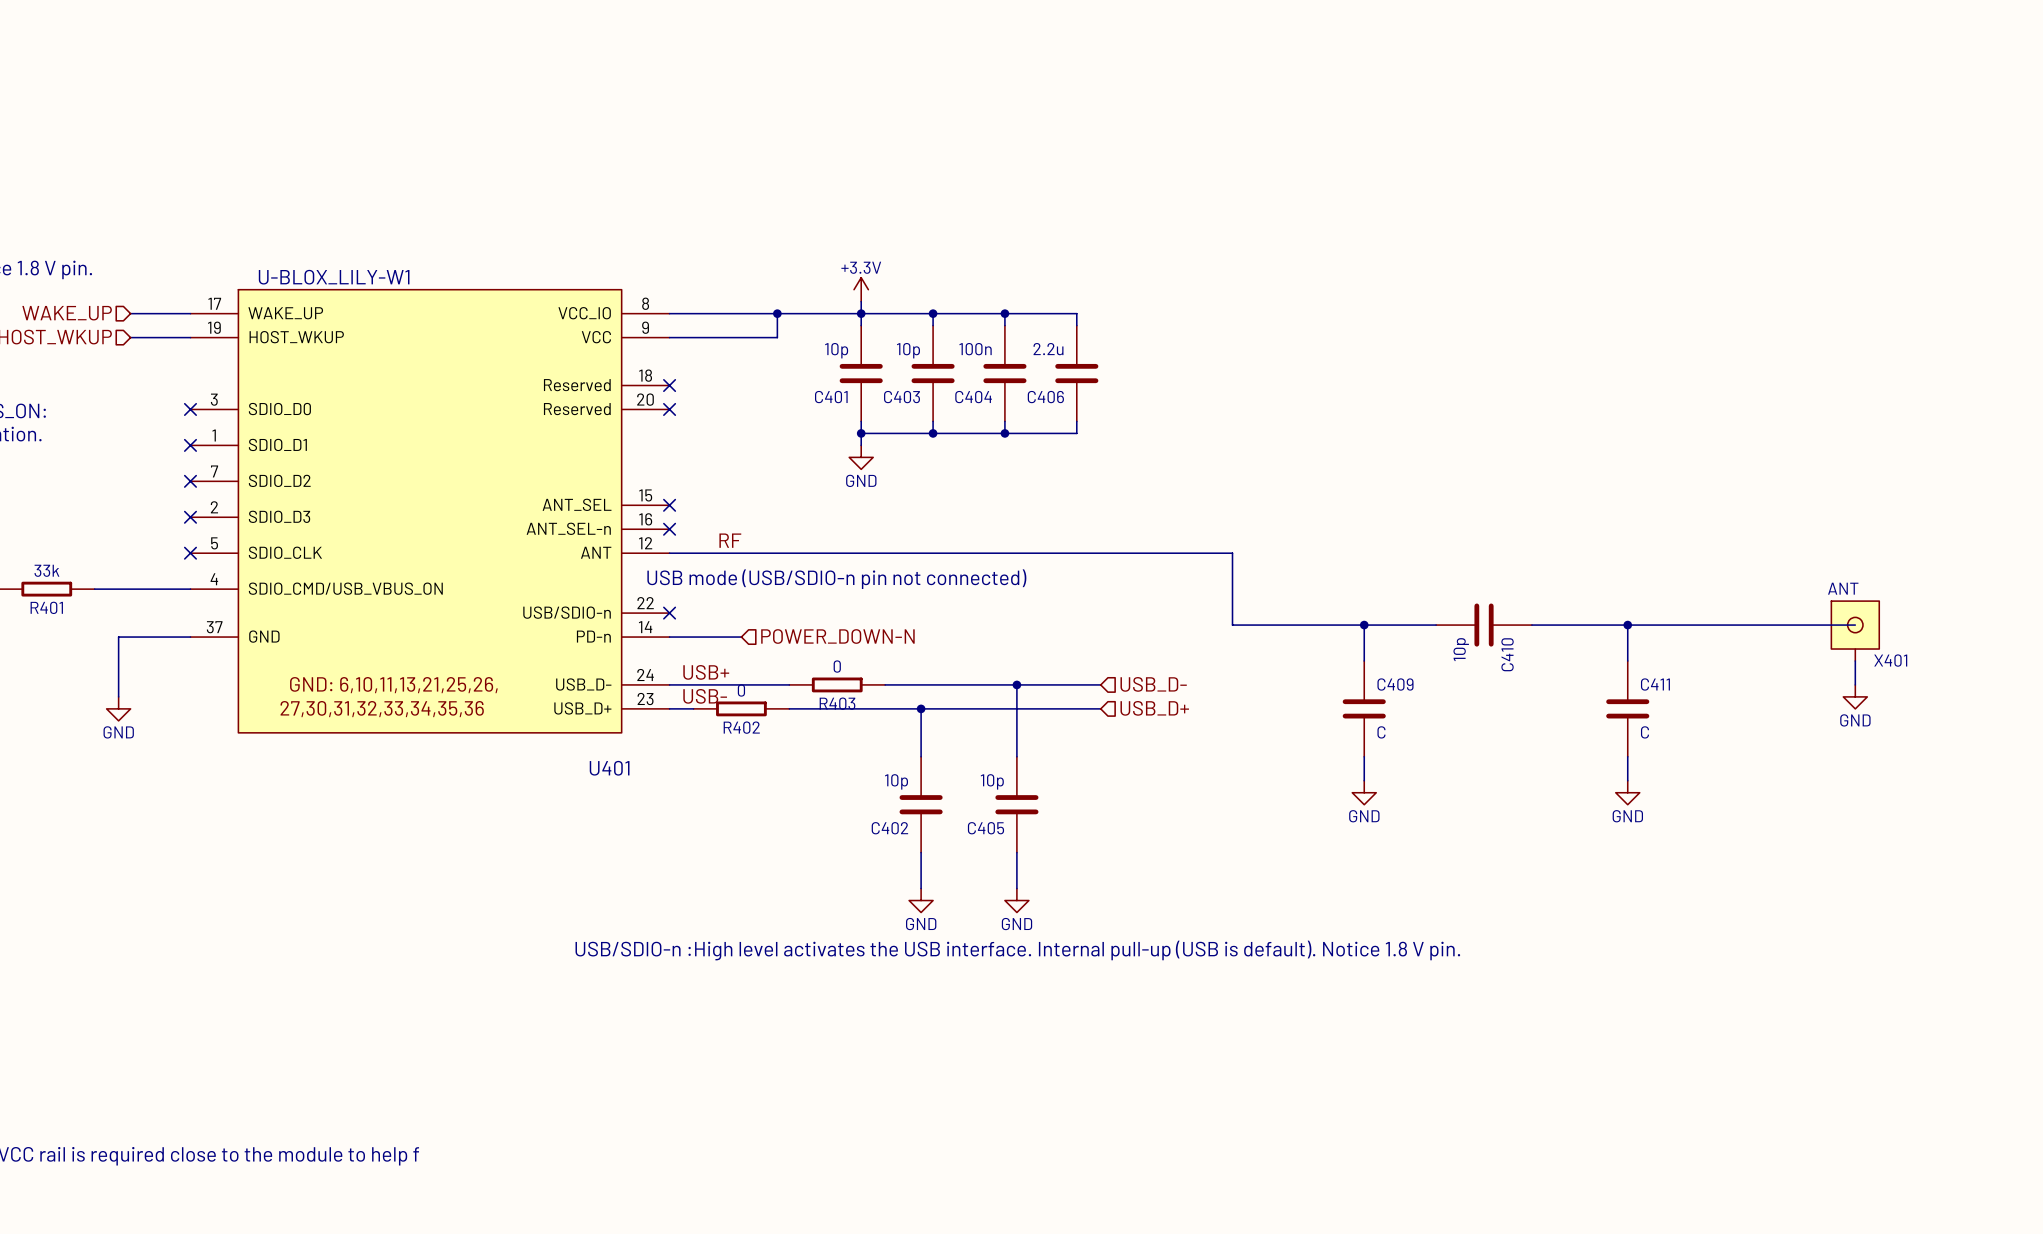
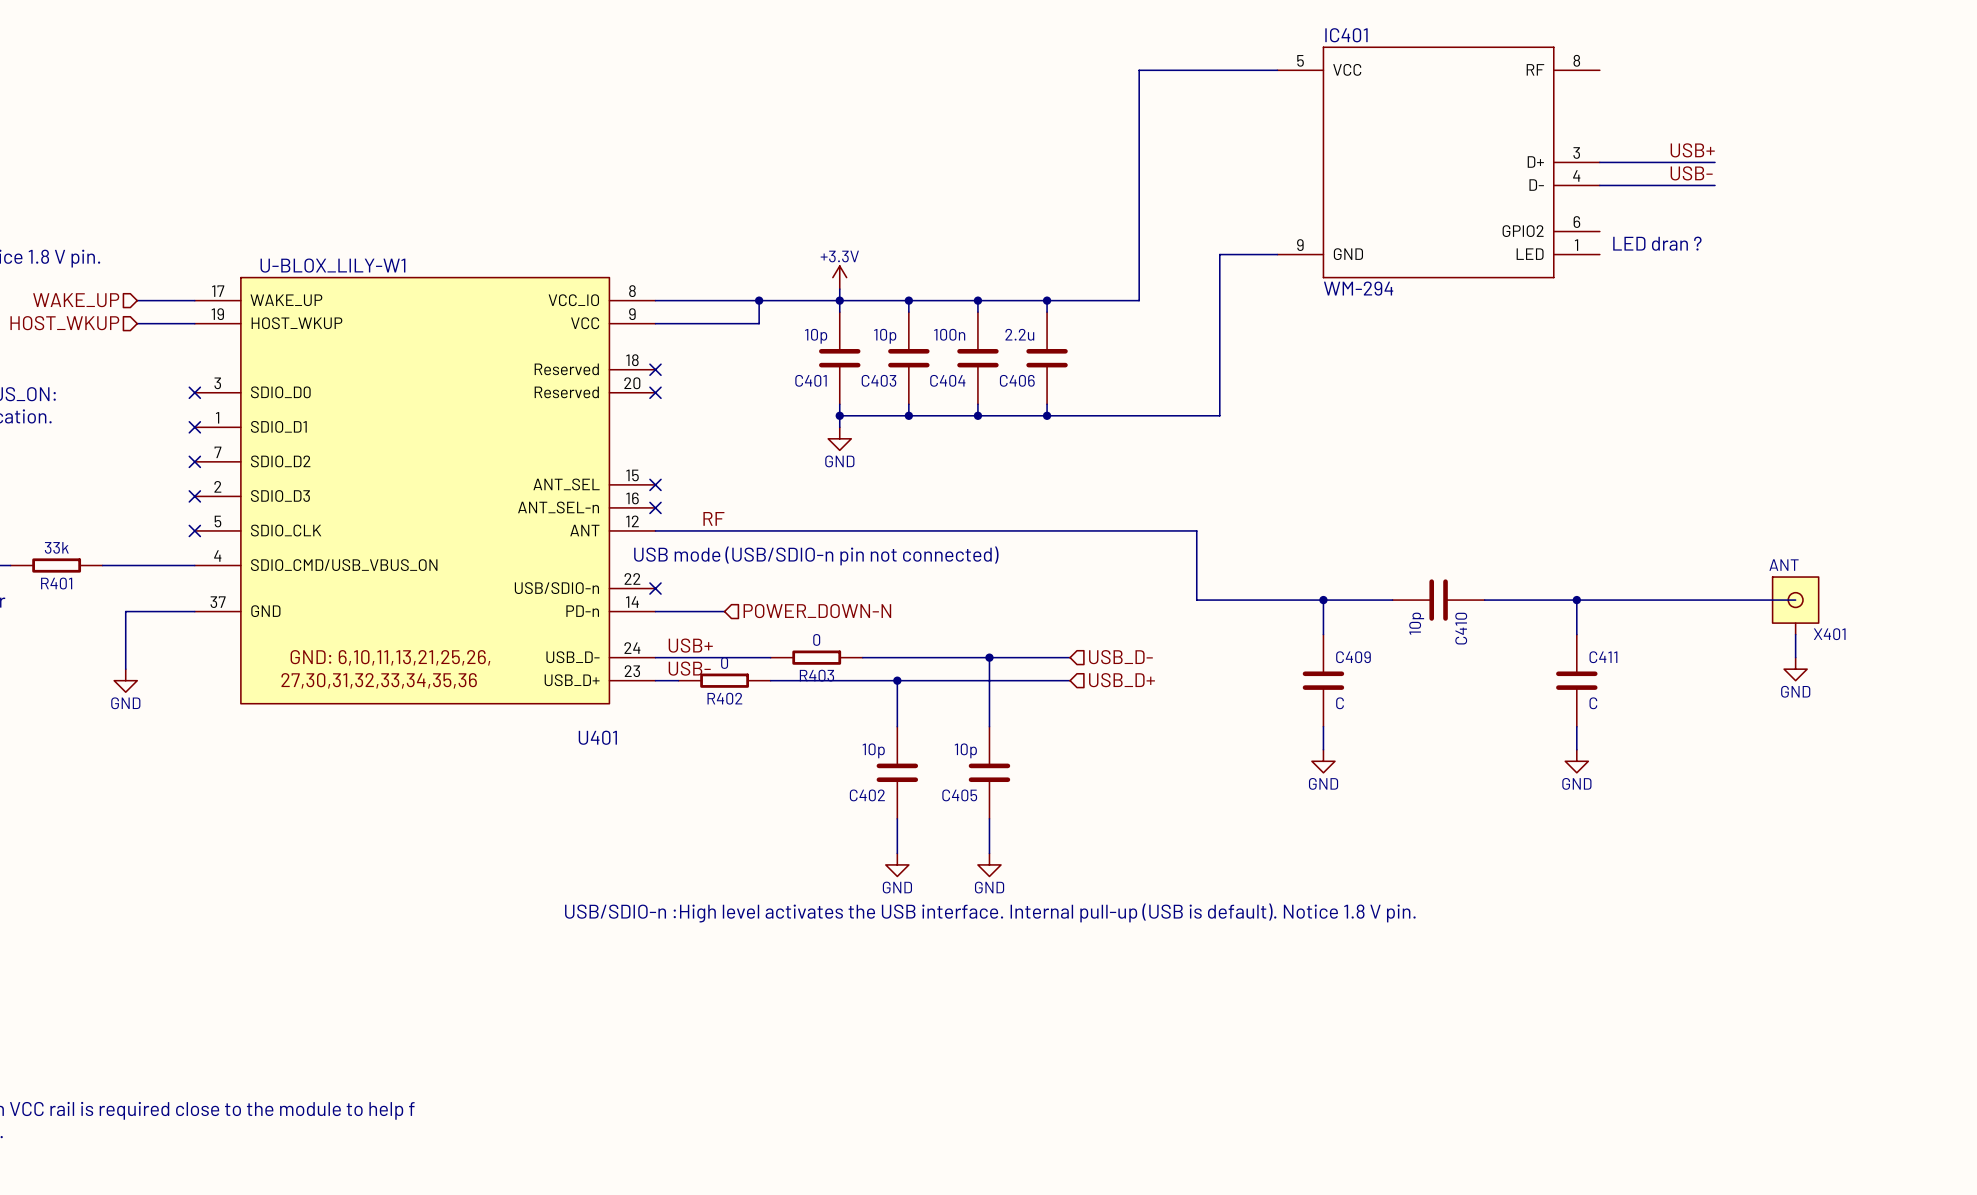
wire: none -> (1277, 70) (1139, 70) (1139, 300) (1047, 300)
label: none -> USB+ (1692, 150)
IC401: none -> WM-294 (1438, 162)
wire: none -> (1599, 162) (1715, 162)
label: none -> USB- (1691, 173)
wire: none -> (1599, 185) (1715, 185)
text: none -> LED dran ? (1657, 243)
wire: none -> (1277, 254) (1219, 254) (1219, 415) (1047, 415)
junction: none -> (1047, 300)
junction: none -> (1047, 415)

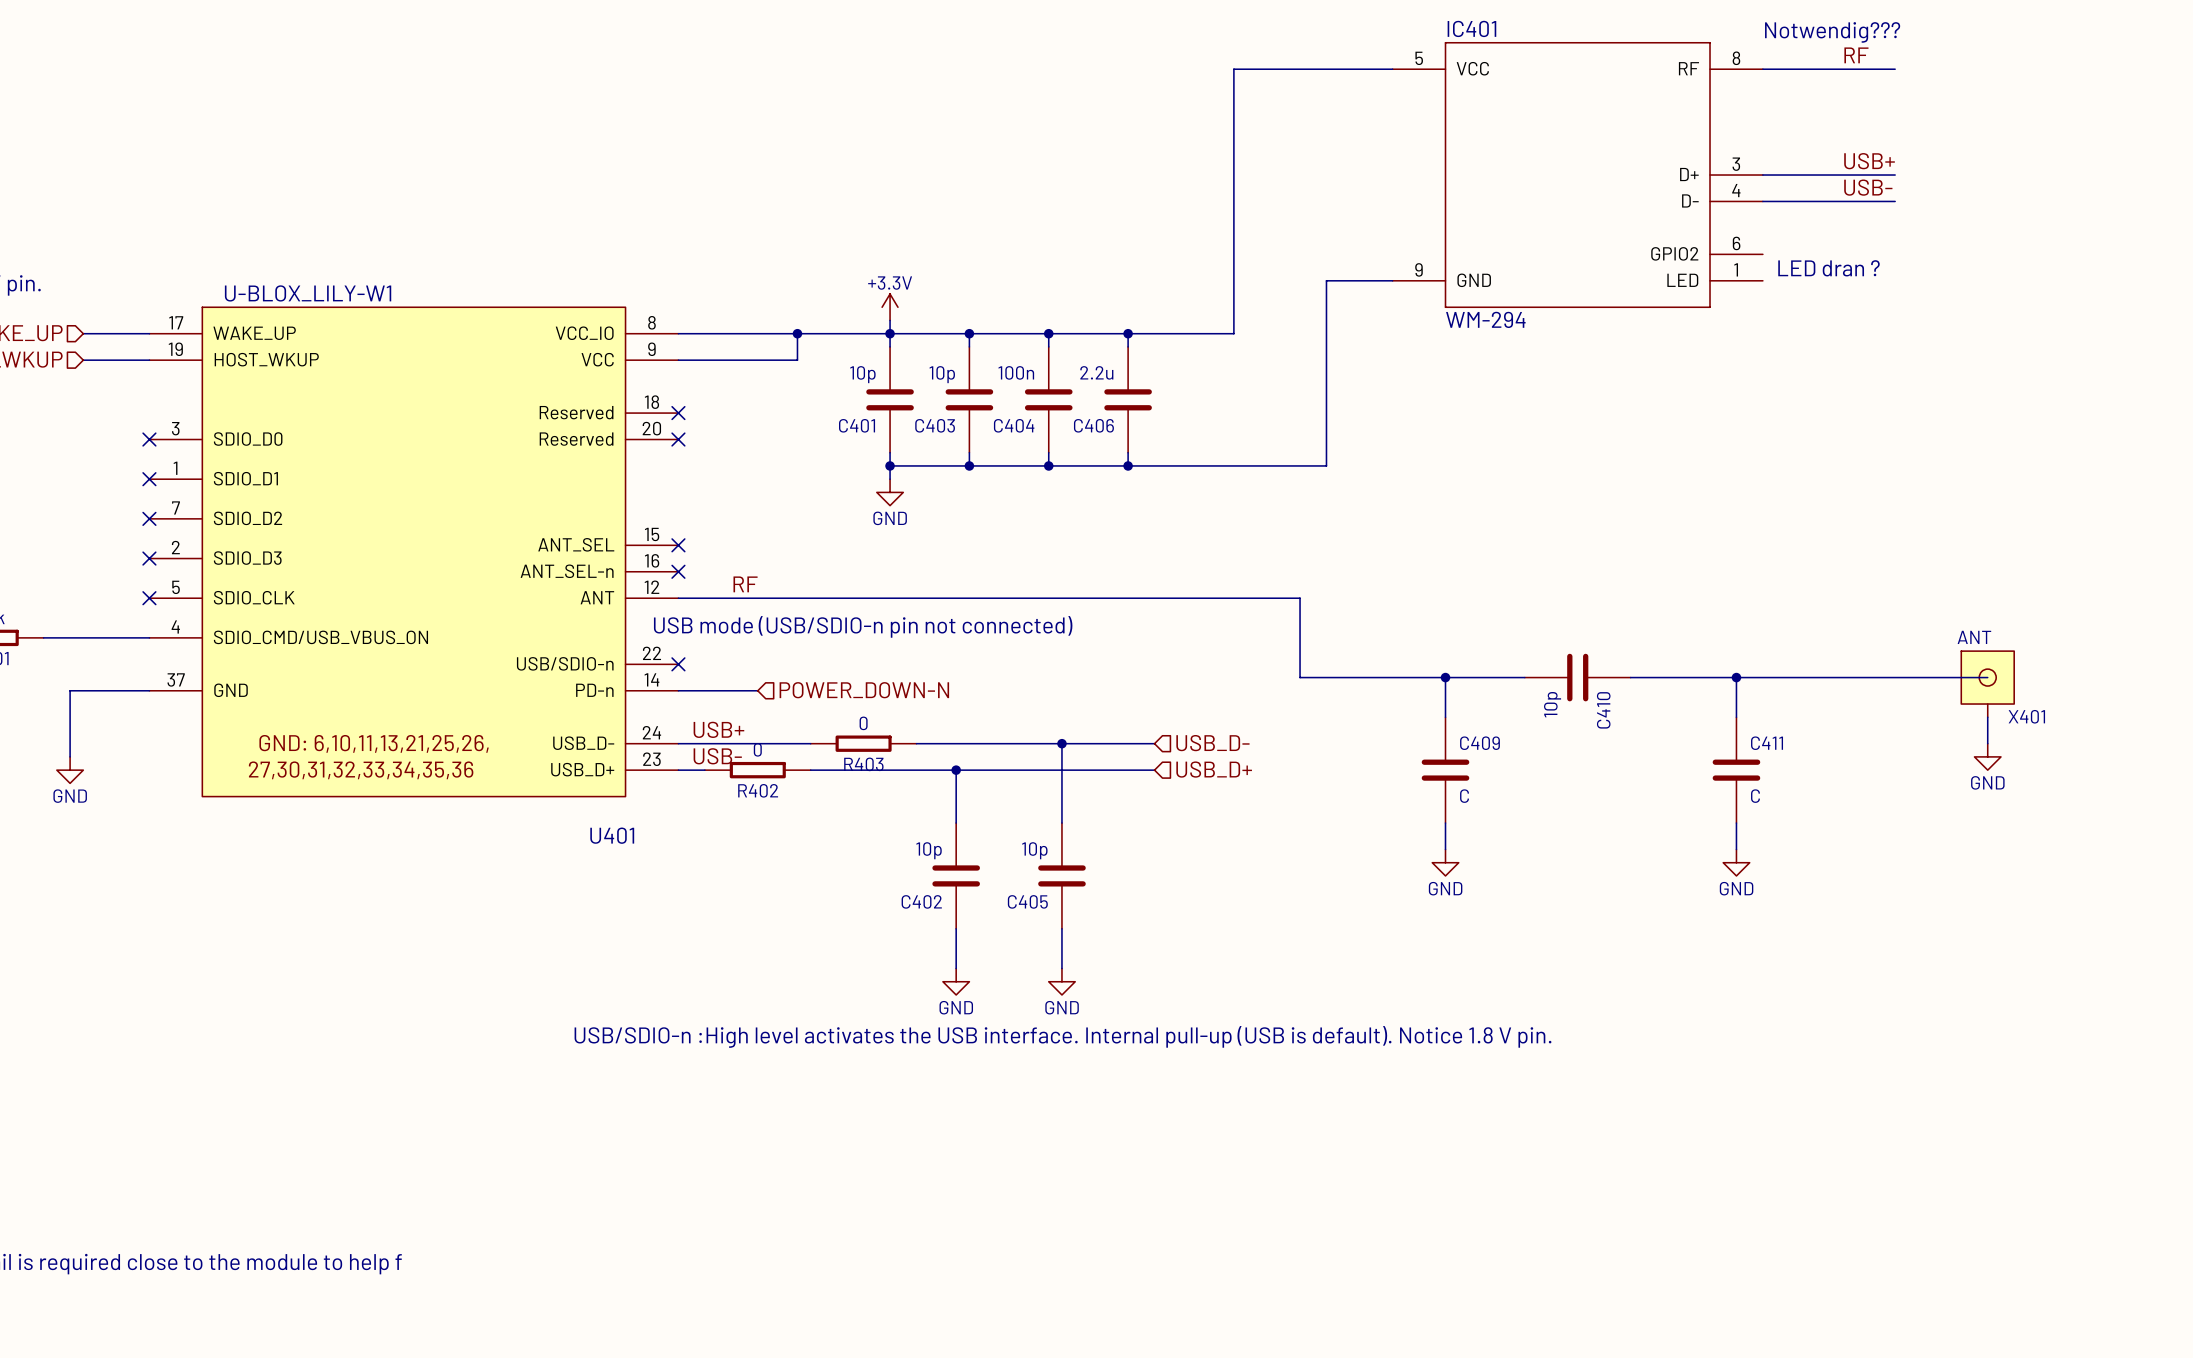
text: none -> Notwendig??? (1832, 32)
label: none -> RF (1856, 55)
wire: none -> (1762, 69) (1895, 69)

